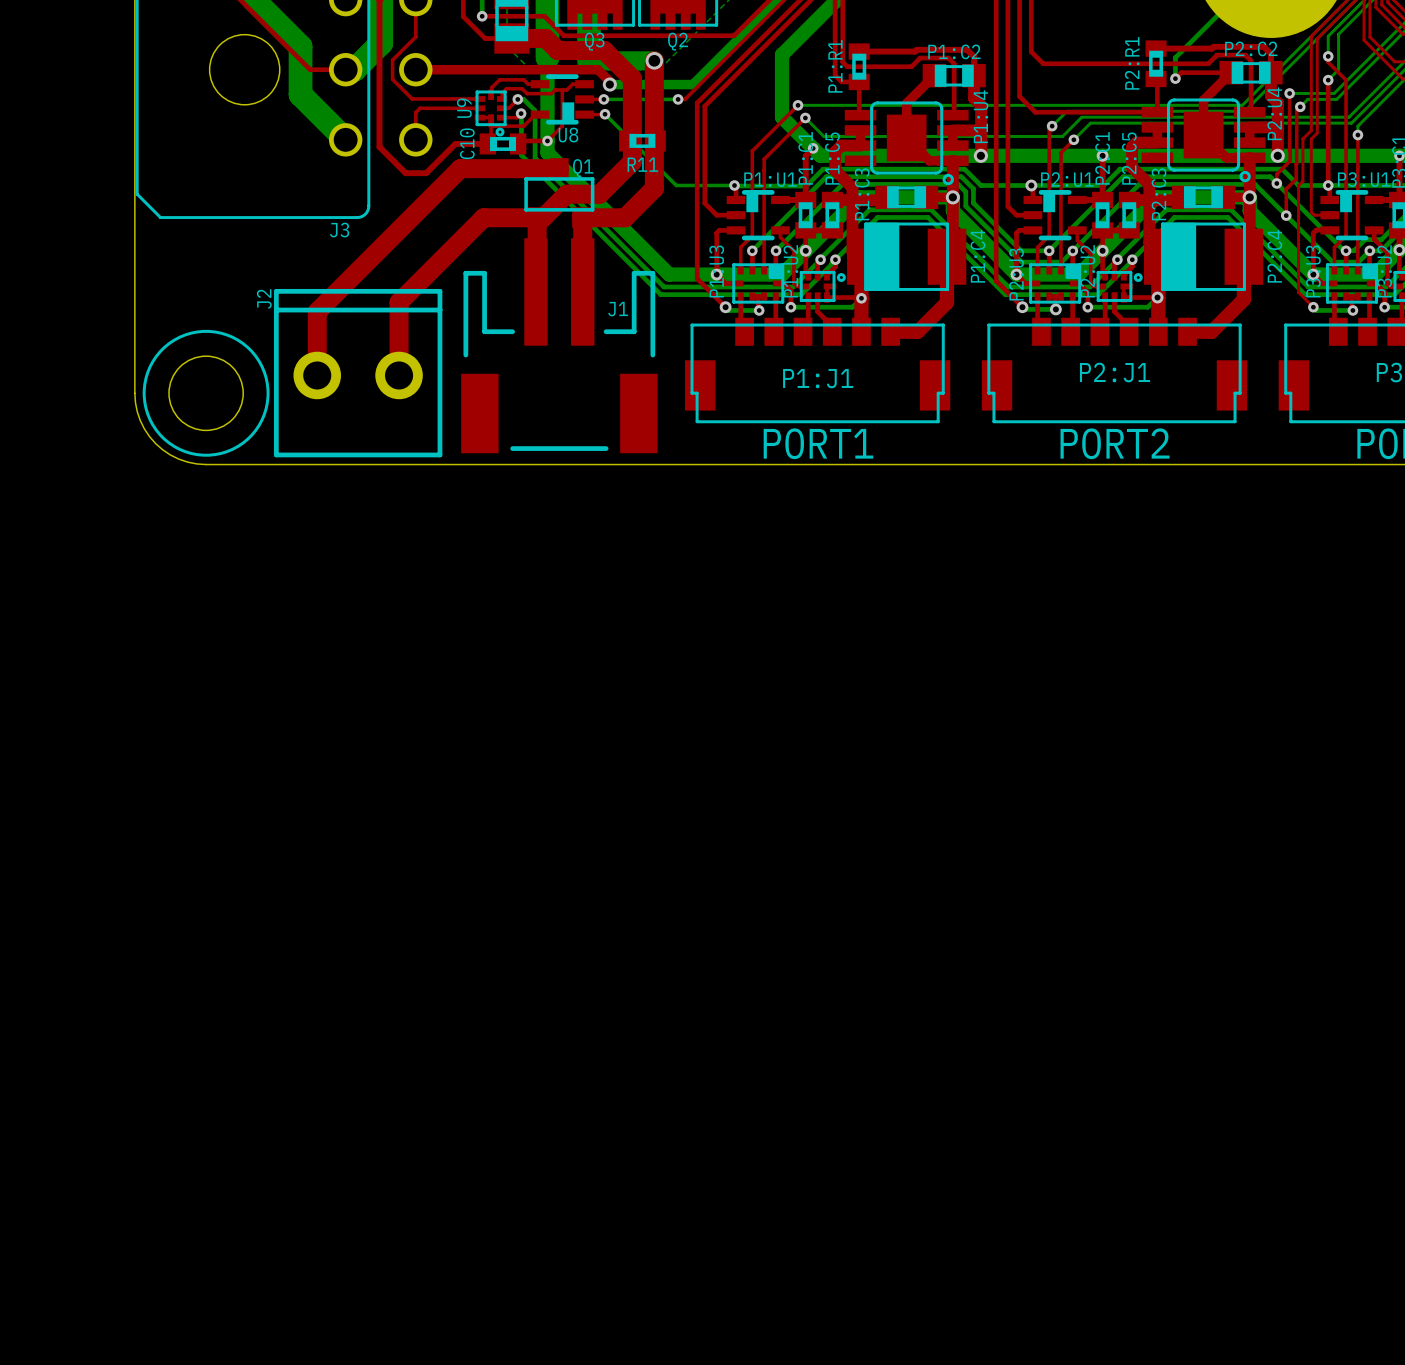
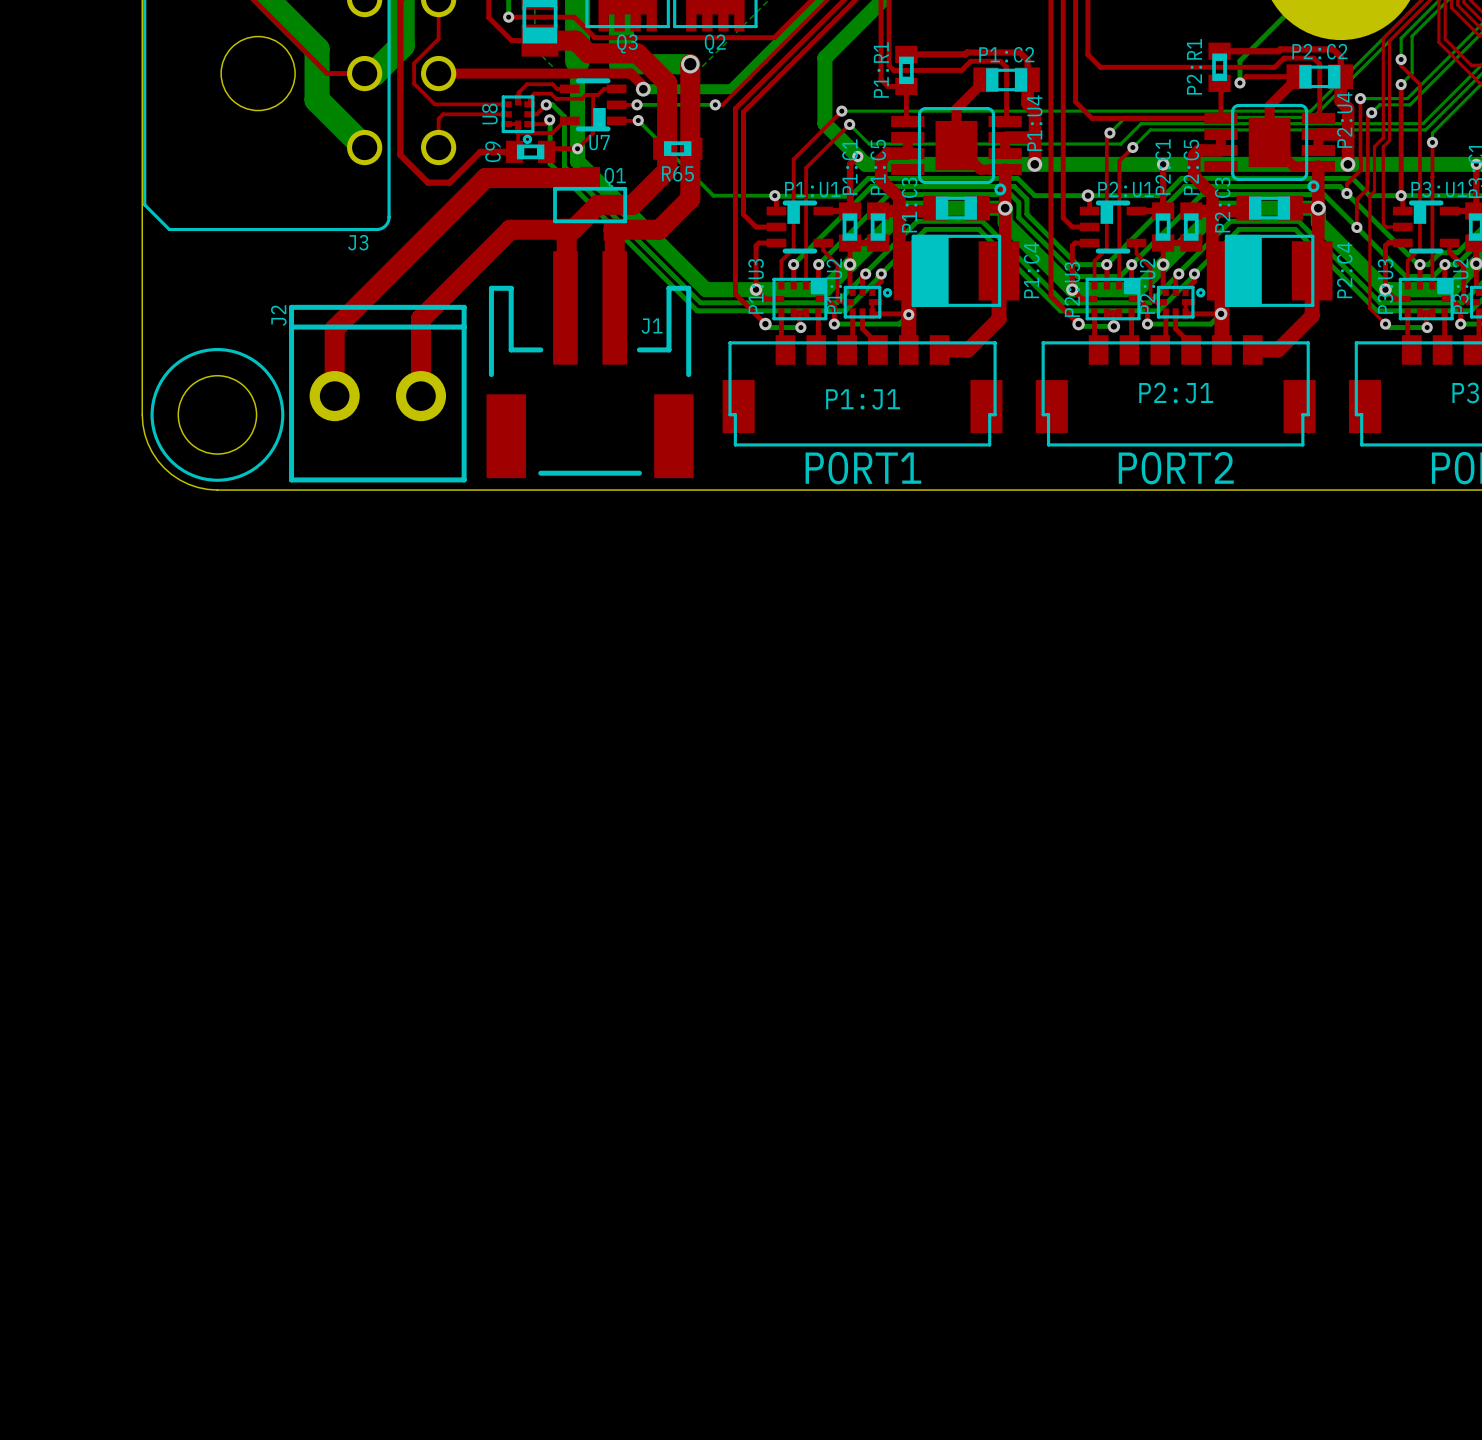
U9 name: U9 (464, 108) -> U8 (489, 114)
U8 name: U8 (568, 135) -> U7 (599, 142)
C10 name: C10 (467, 143) -> C9 (493, 151)
R11 name: R11 (642, 164) -> R65 (677, 173)

